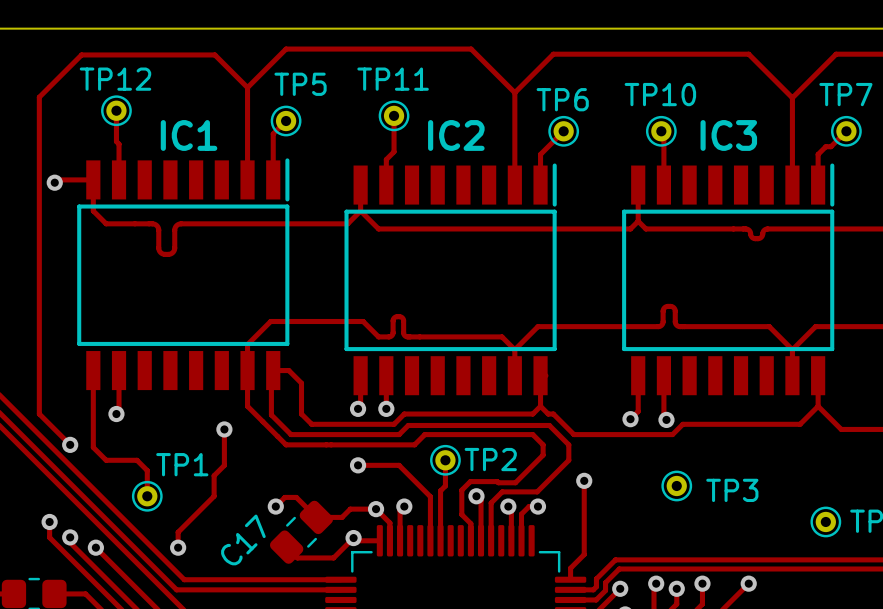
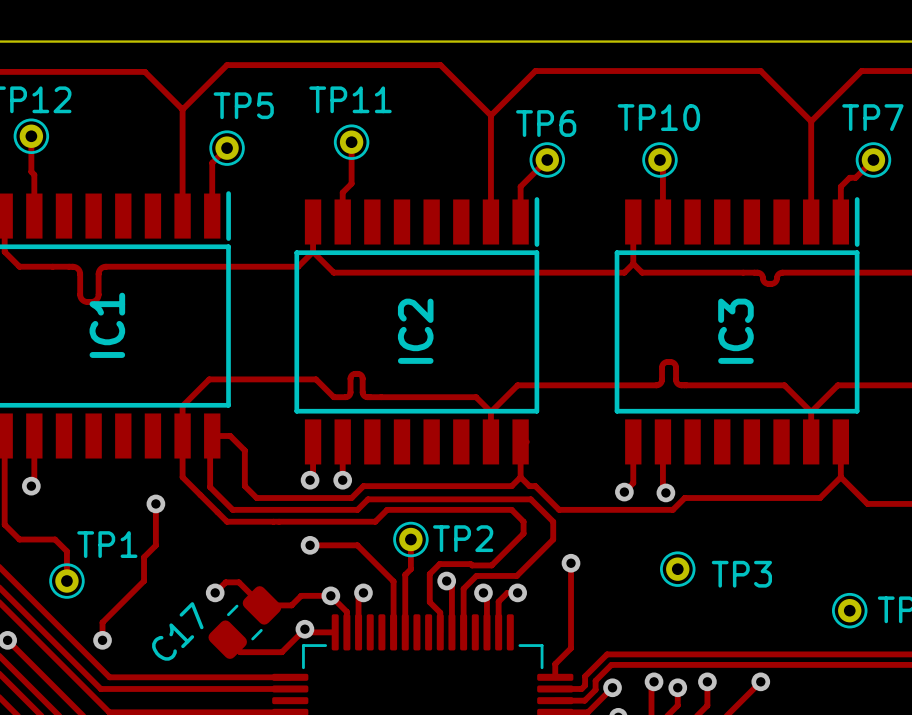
IC1 name rotation: 0° (189, 135) -> 90° counterclockwise (107, 325)
IC1 name position: IC1 (189, 135) -> IC1 (107, 325)
IC2 name rotation: 0° (456, 135) -> 90° counterclockwise (415, 331)
IC2 name position: IC2 (456, 135) -> IC2 (415, 331)
IC3 name rotation: 0° (728, 135) -> 90° counterclockwise (735, 331)
IC3 name position: IC3 (728, 135) -> IC3 (735, 331)

